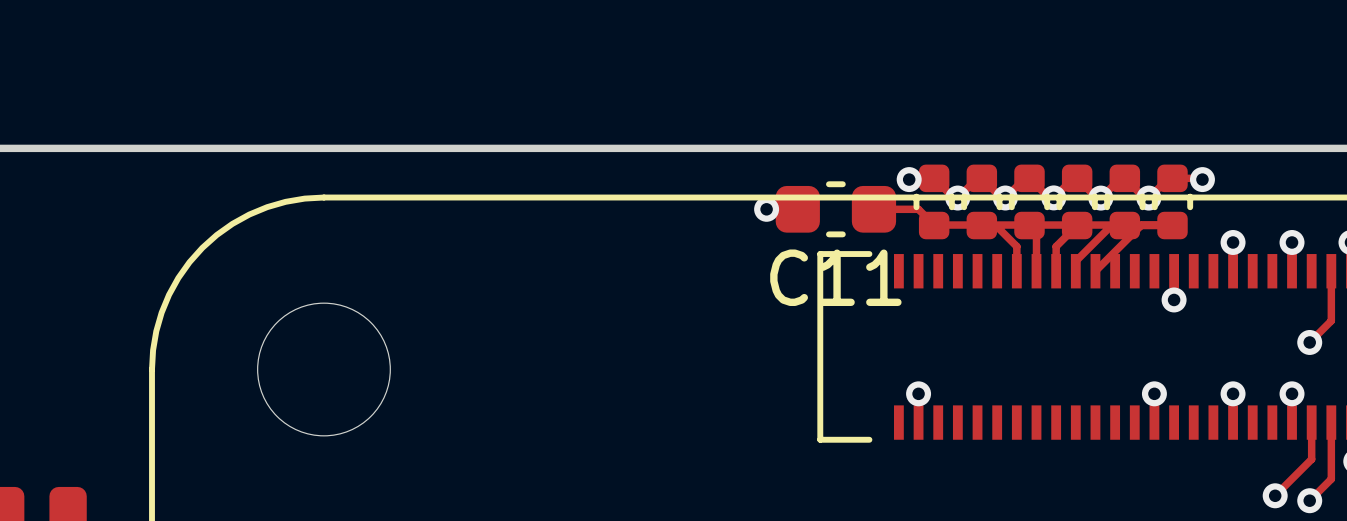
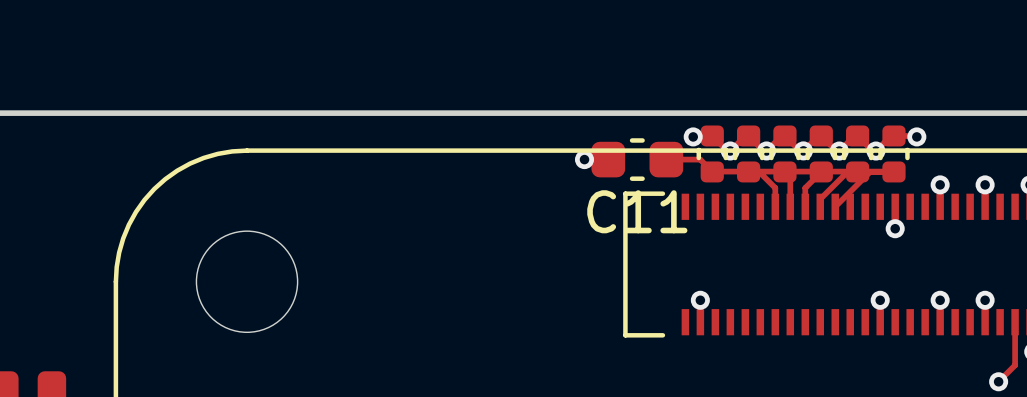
track: (1331, 271) (1331, 320) (1309, 342) -> none
via: (1309, 342) -> none
track: (1311, 422) (1311, 459) (1275, 495) -> none
via: (1275, 495) -> none

